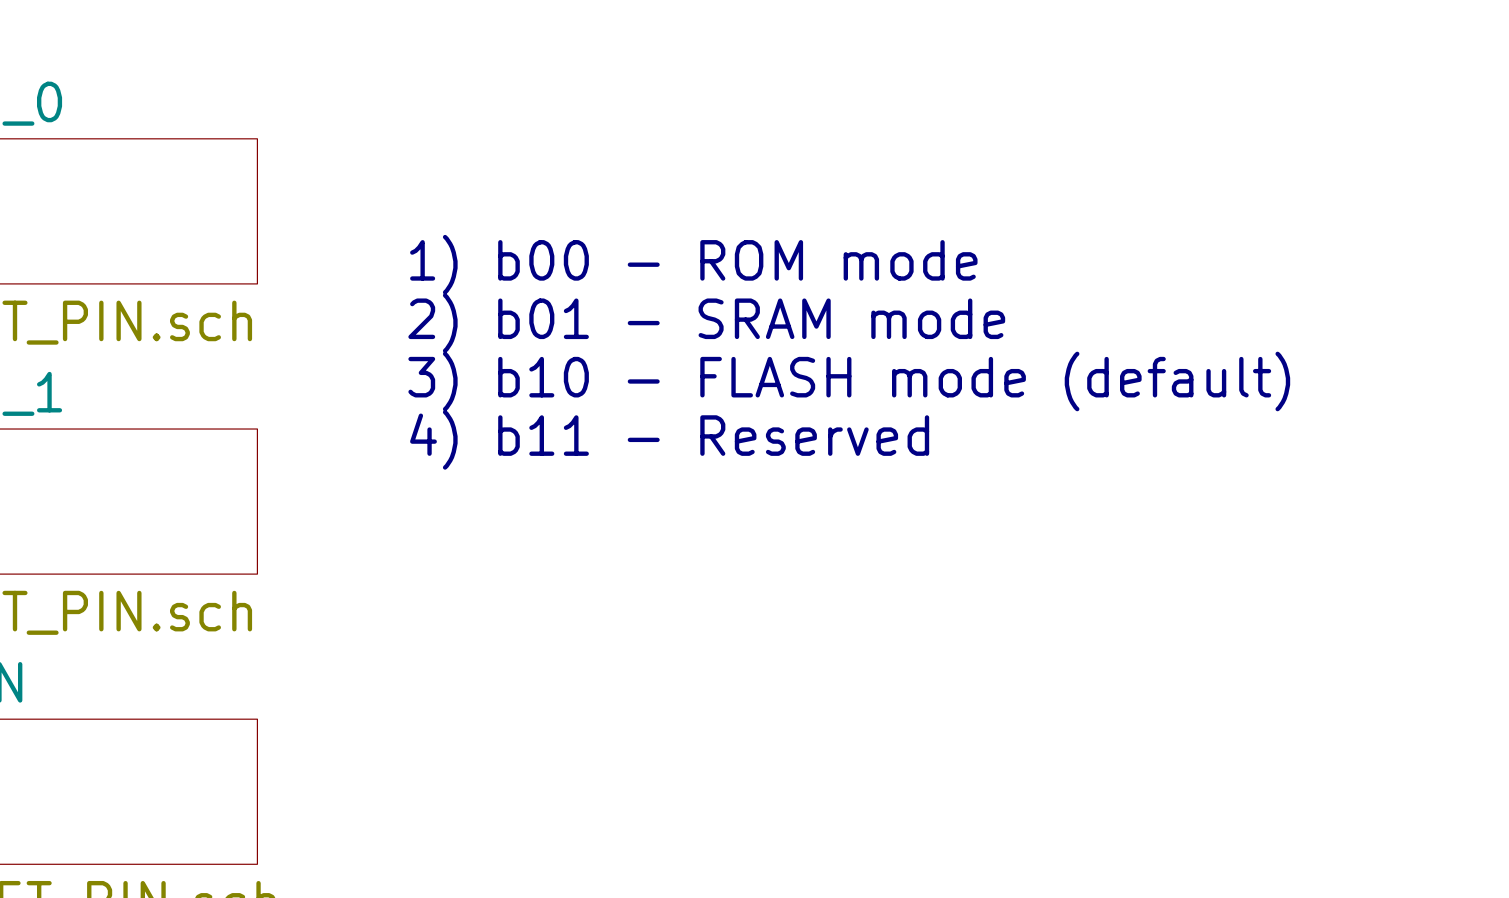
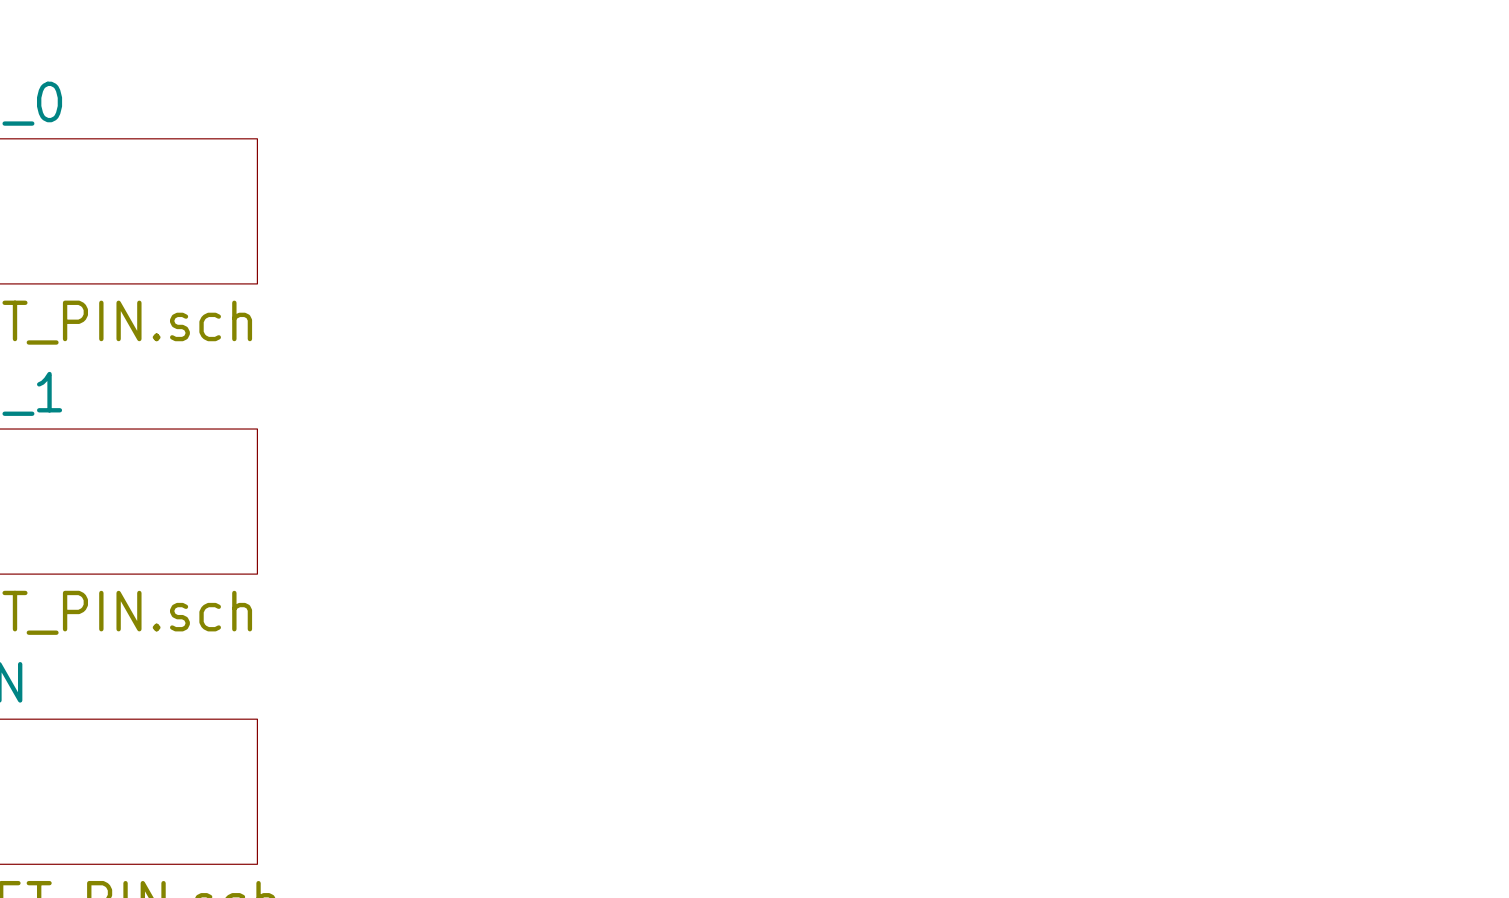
text: 1) b00 - ROM mode (693, 264) -> none
text: 2) b01 - SRAM mode (706, 323) -> none
text: 3) b10 - FLASH mode (default) (849, 381) -> none
text: 4) b11 - Reserved (669, 439) -> none

